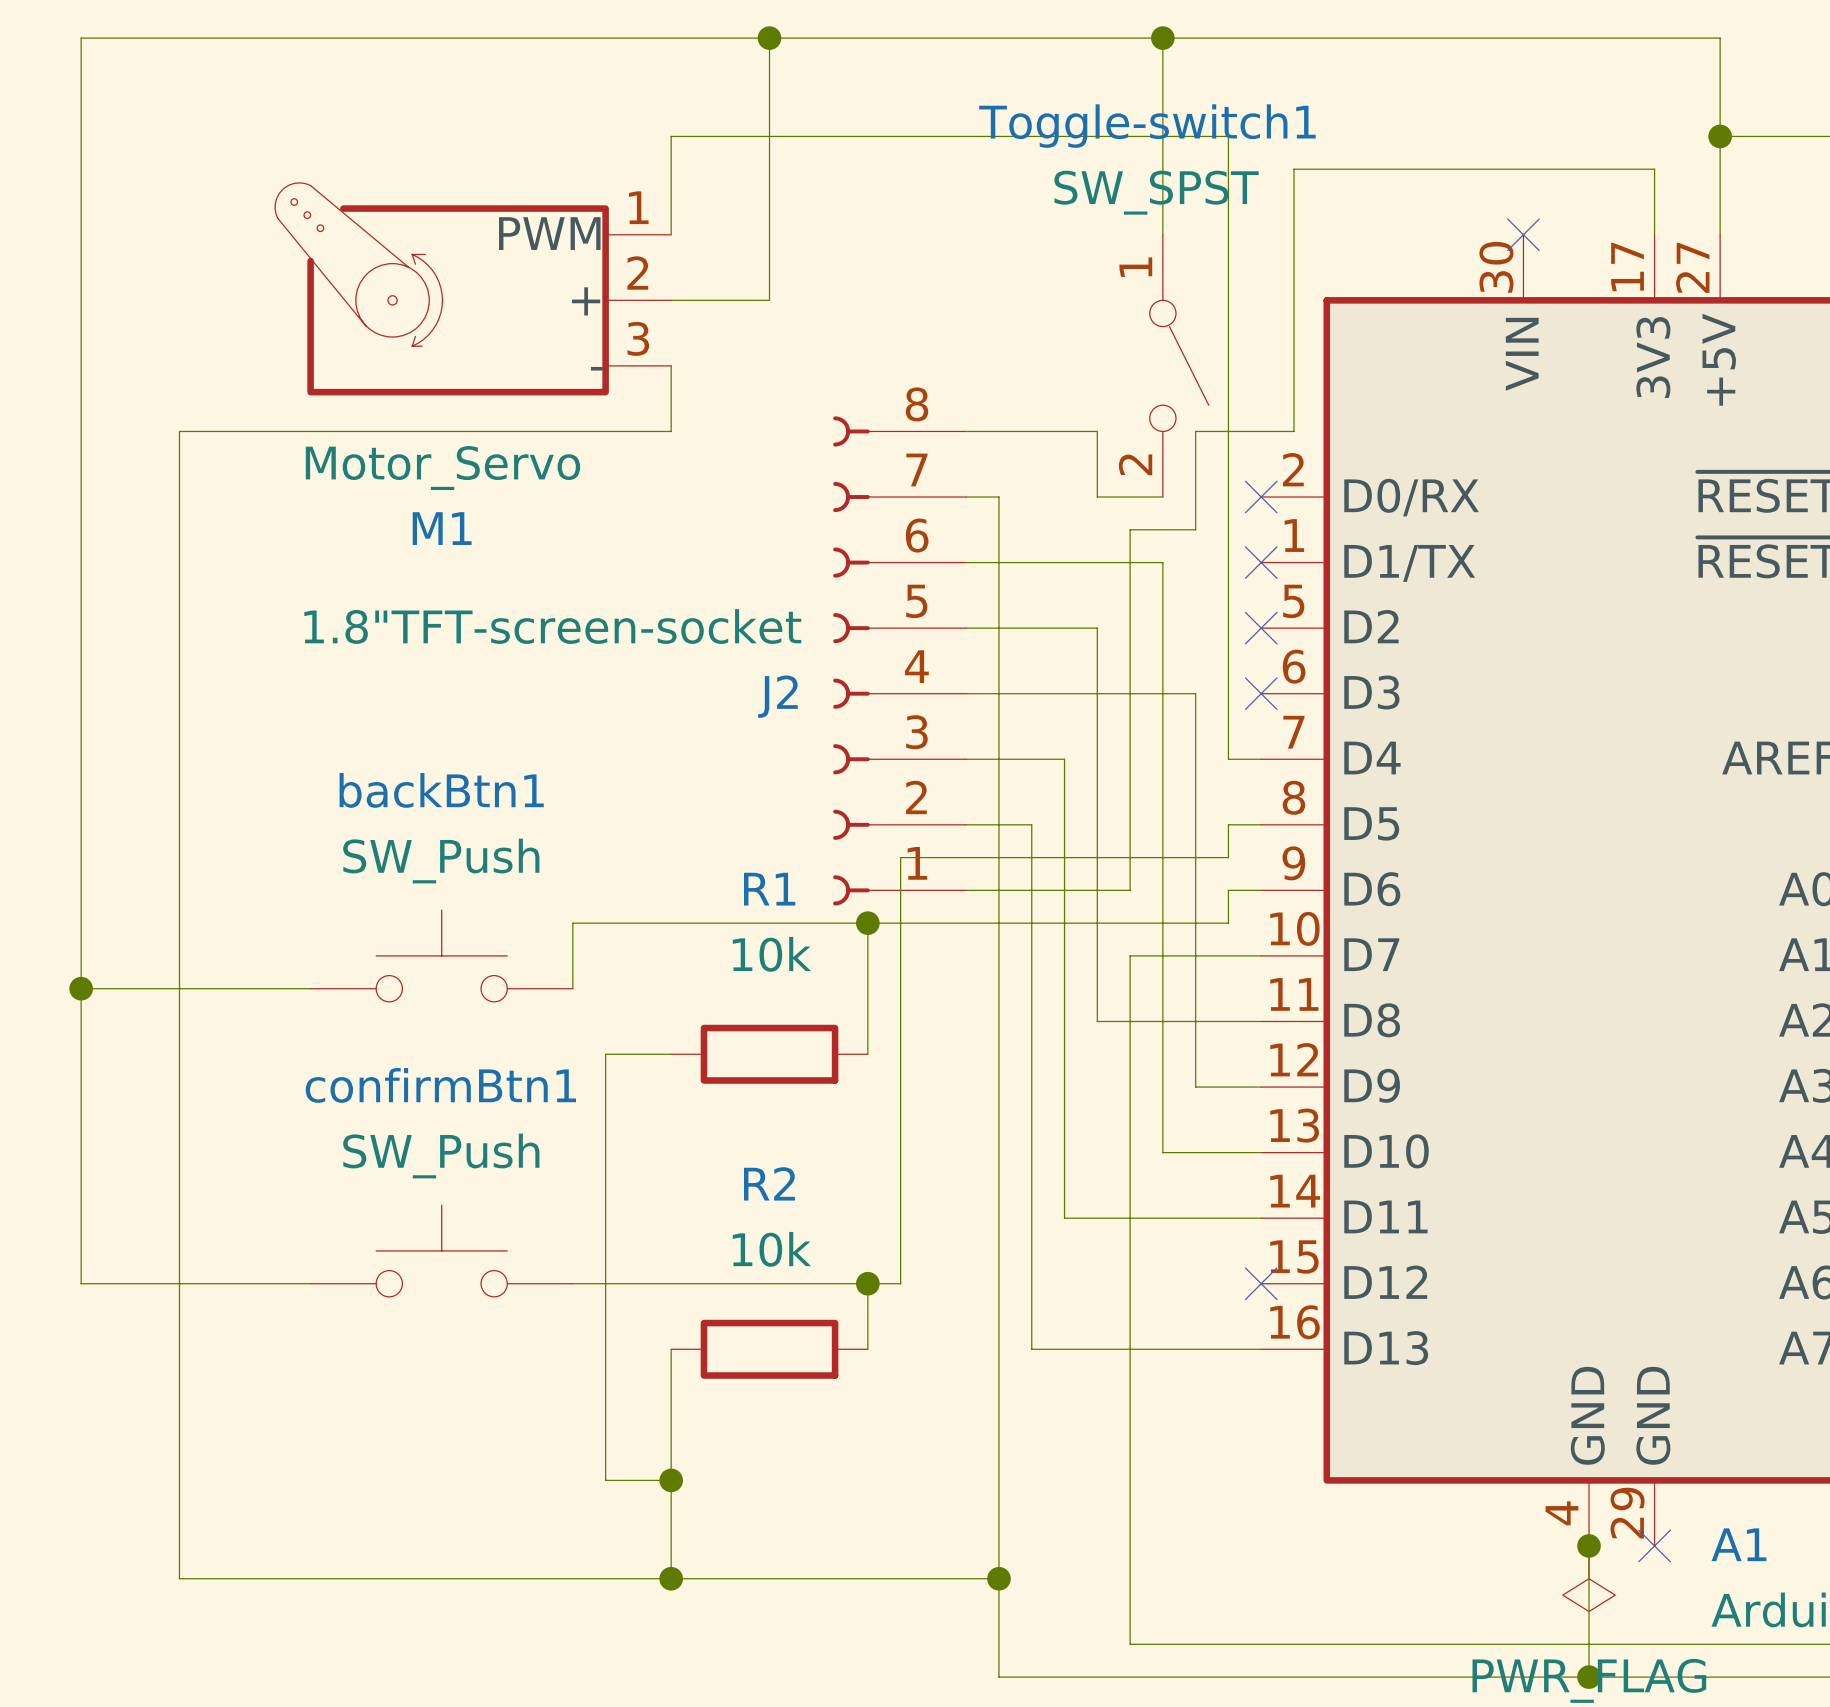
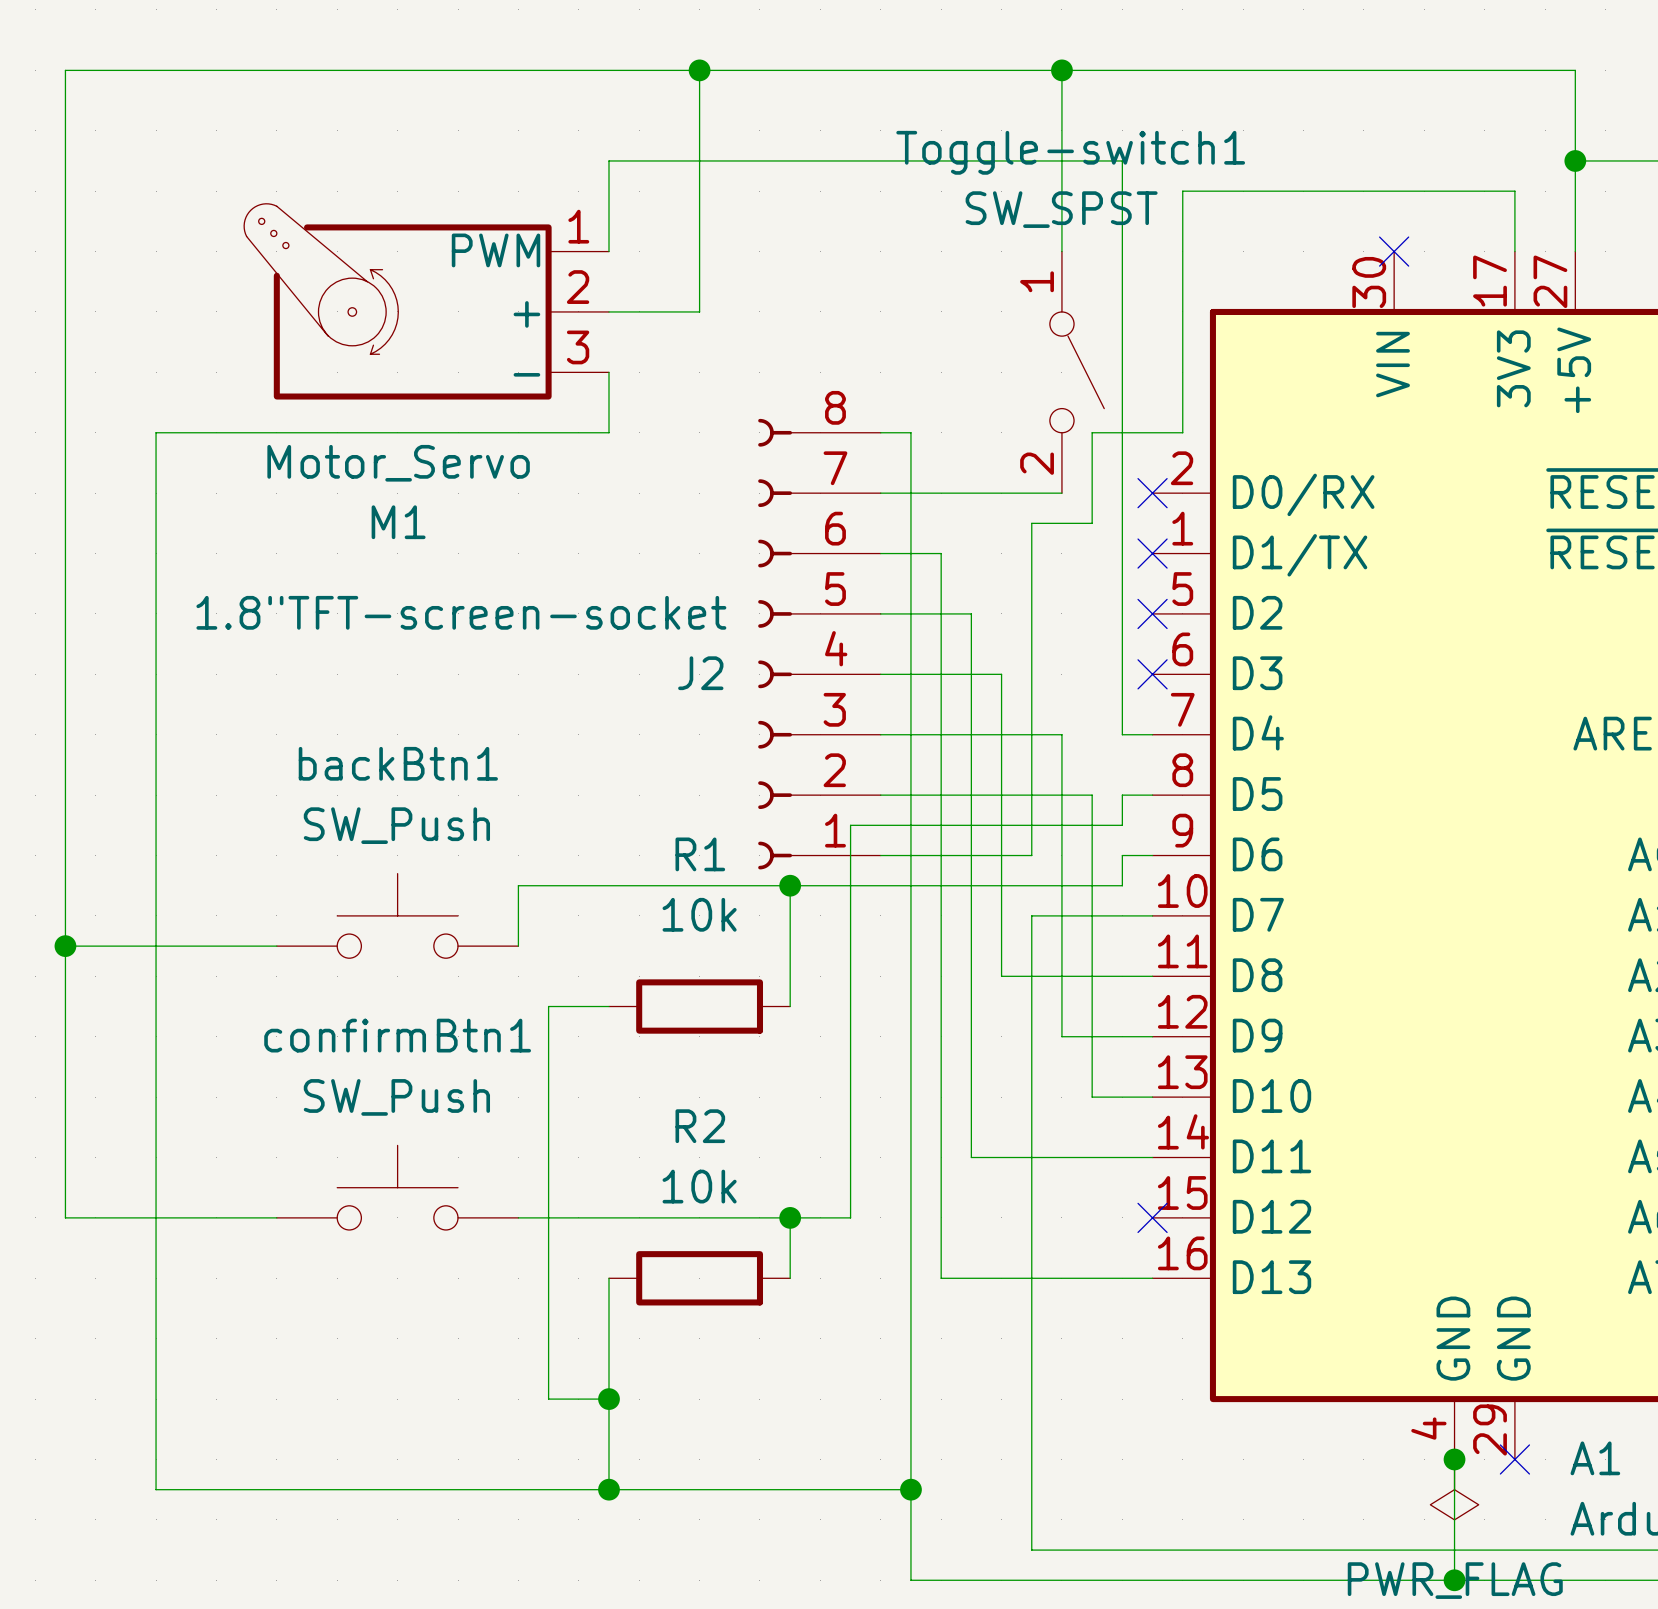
wire: (998, 431) (1097, 431) (1097, 497) -> (910, 432) (910, 493) (1001, 493)
wire: (1031, 562) (1162, 562) (1162, 759) -> (941, 553) (941, 795) (1092, 795)
wire: (1064, 628) (1097, 628) (1097, 693) (1195, 693) (1195, 824) -> (971, 613) (971, 734) (1061, 734)
wire: (933, 857) (900, 857) (900, 1283) -> (850, 825) (850, 1217) (820, 1217)
wire: (1162, 1087) (1162, 1152) (1195, 1152) -> (1061, 1036) (1092, 1036) (1092, 1097)

